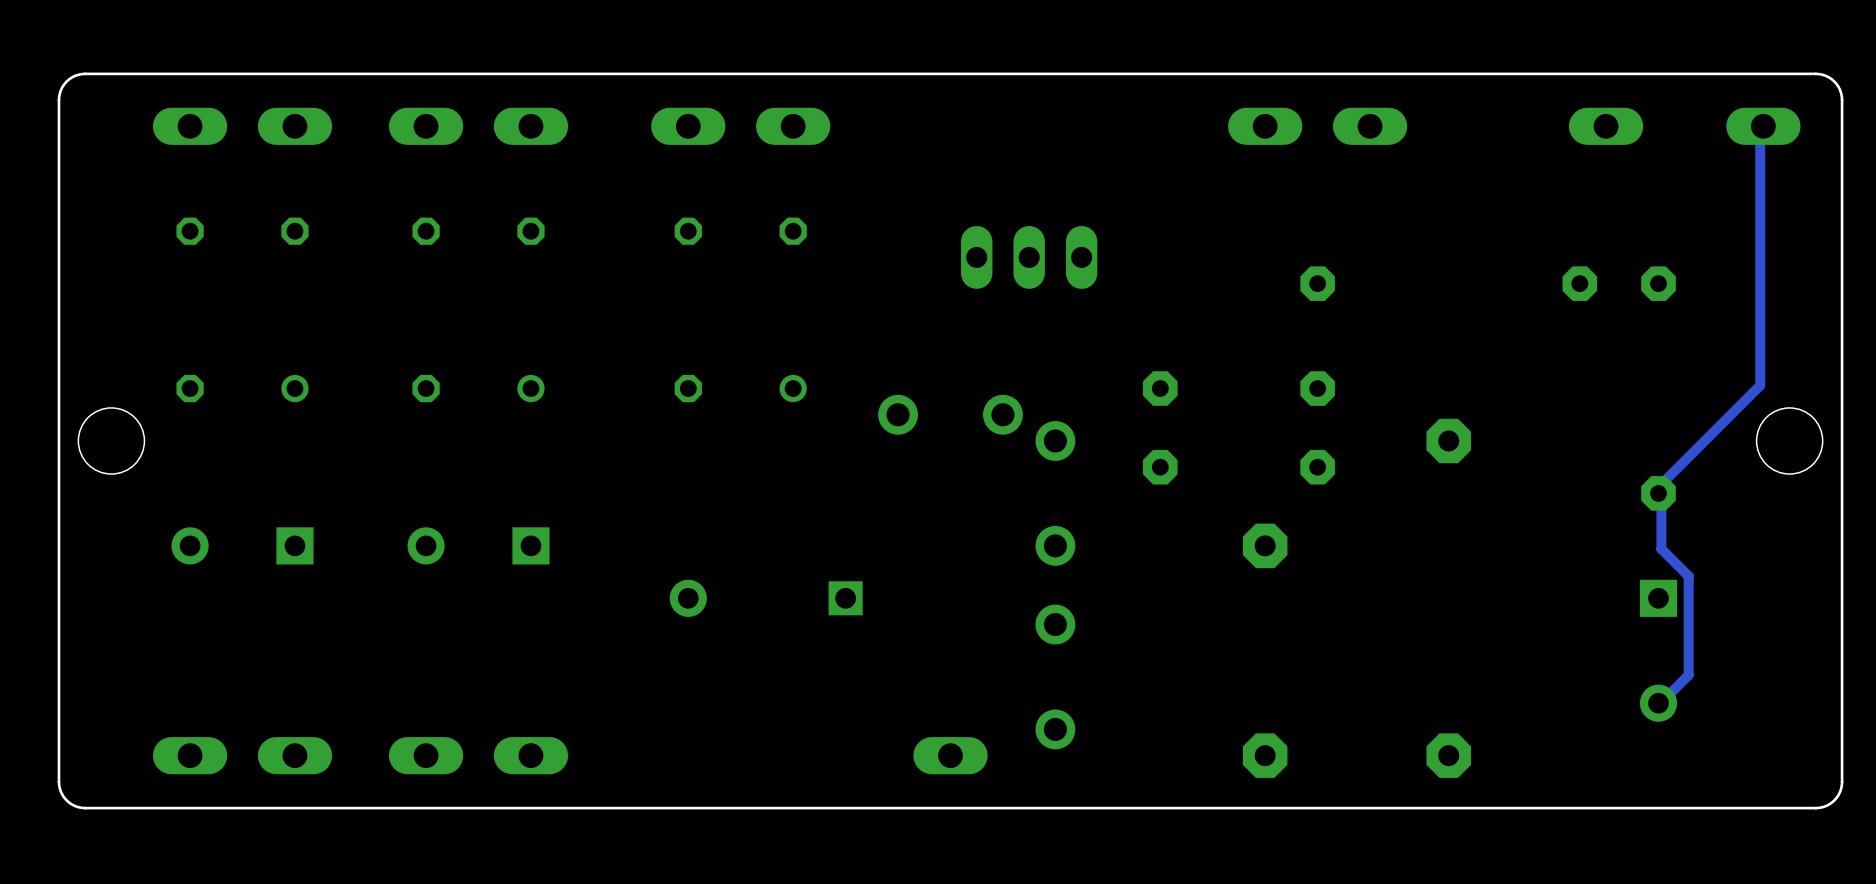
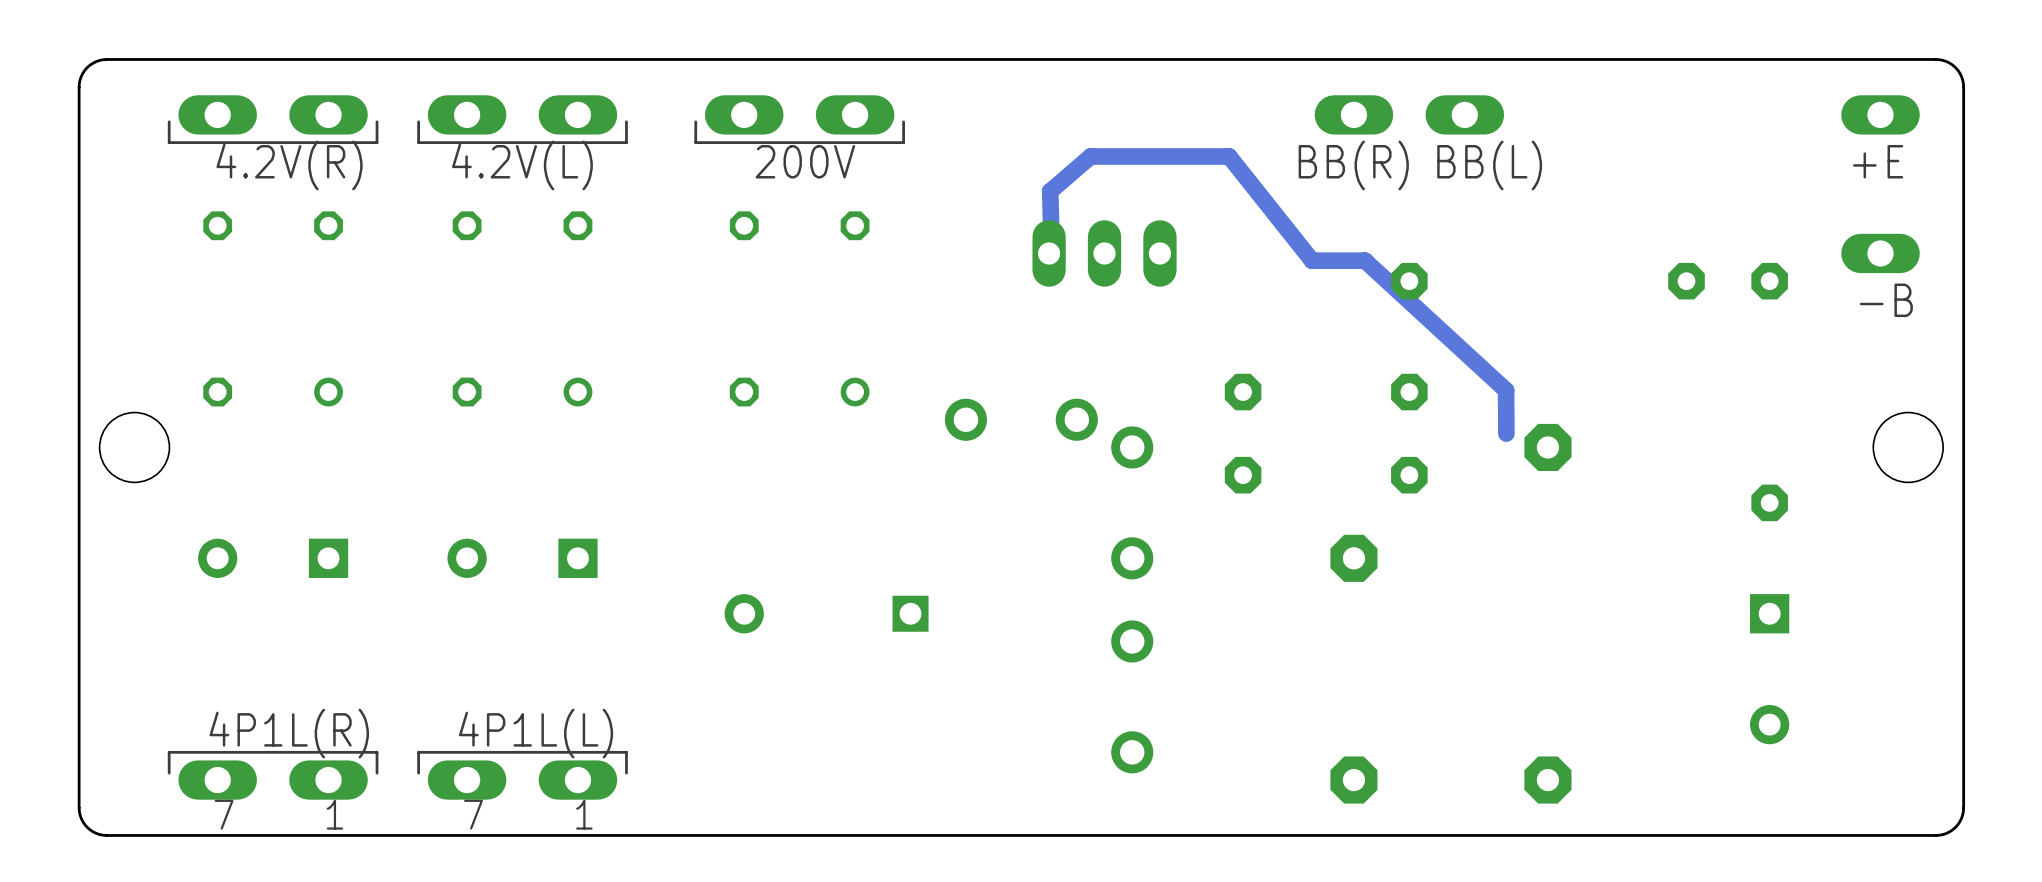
part footprint: [57, 72, 1844, 810] -> [77, 58, 1966, 837]
track: (1763, 126) (1760, 126) (1760, 385) (1664, 480) (1664, 491) (1658, 493) (1661, 494) (1661, 549) (1688, 576) (1688, 675) (1658, 703) -> none
track: none -> (1049, 253) (1052, 255) (1052, 262) (1050, 191) (1090, 156) (1229, 156) (1312, 260) (1365, 260) (1506, 390) (1506, 433)

